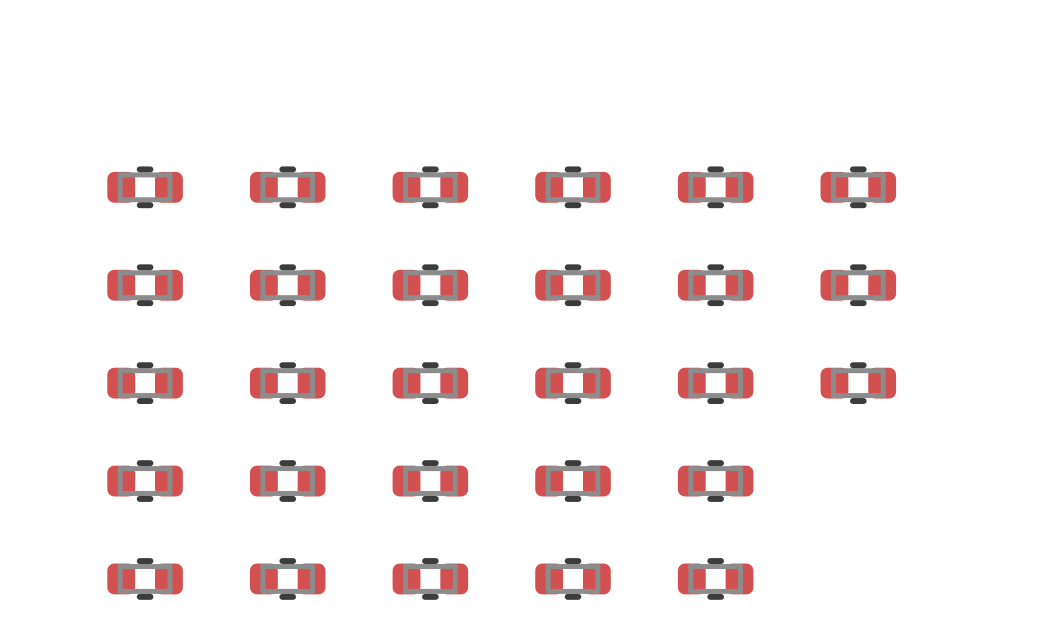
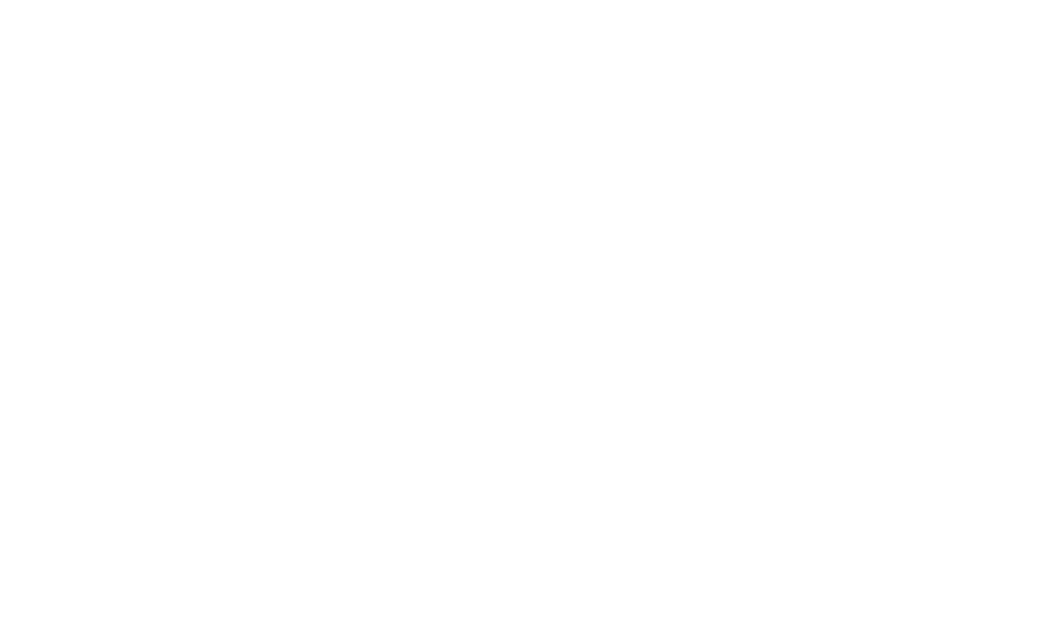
part: (145, 187) -> none
part: (287, 187) -> none
part: (430, 187) -> none
part: (573, 187) -> none
part: (715, 187) -> none
part: (858, 187) -> none
part: (145, 285) -> none
part: (287, 285) -> none
part: (430, 285) -> none
part: (573, 285) -> none
part: (715, 285) -> none
part: (858, 285) -> none
part: (145, 383) -> none
part: (287, 383) -> none
part: (430, 383) -> none
part: (573, 383) -> none
part: (715, 383) -> none
part: (858, 383) -> none
part: (145, 481) -> none
part: (287, 481) -> none
part: (430, 481) -> none
part: (573, 481) -> none
part: (715, 481) -> none
part: (145, 578) -> none
part: (287, 578) -> none
part: (430, 578) -> none
part: (573, 578) -> none
part: (715, 578) -> none

